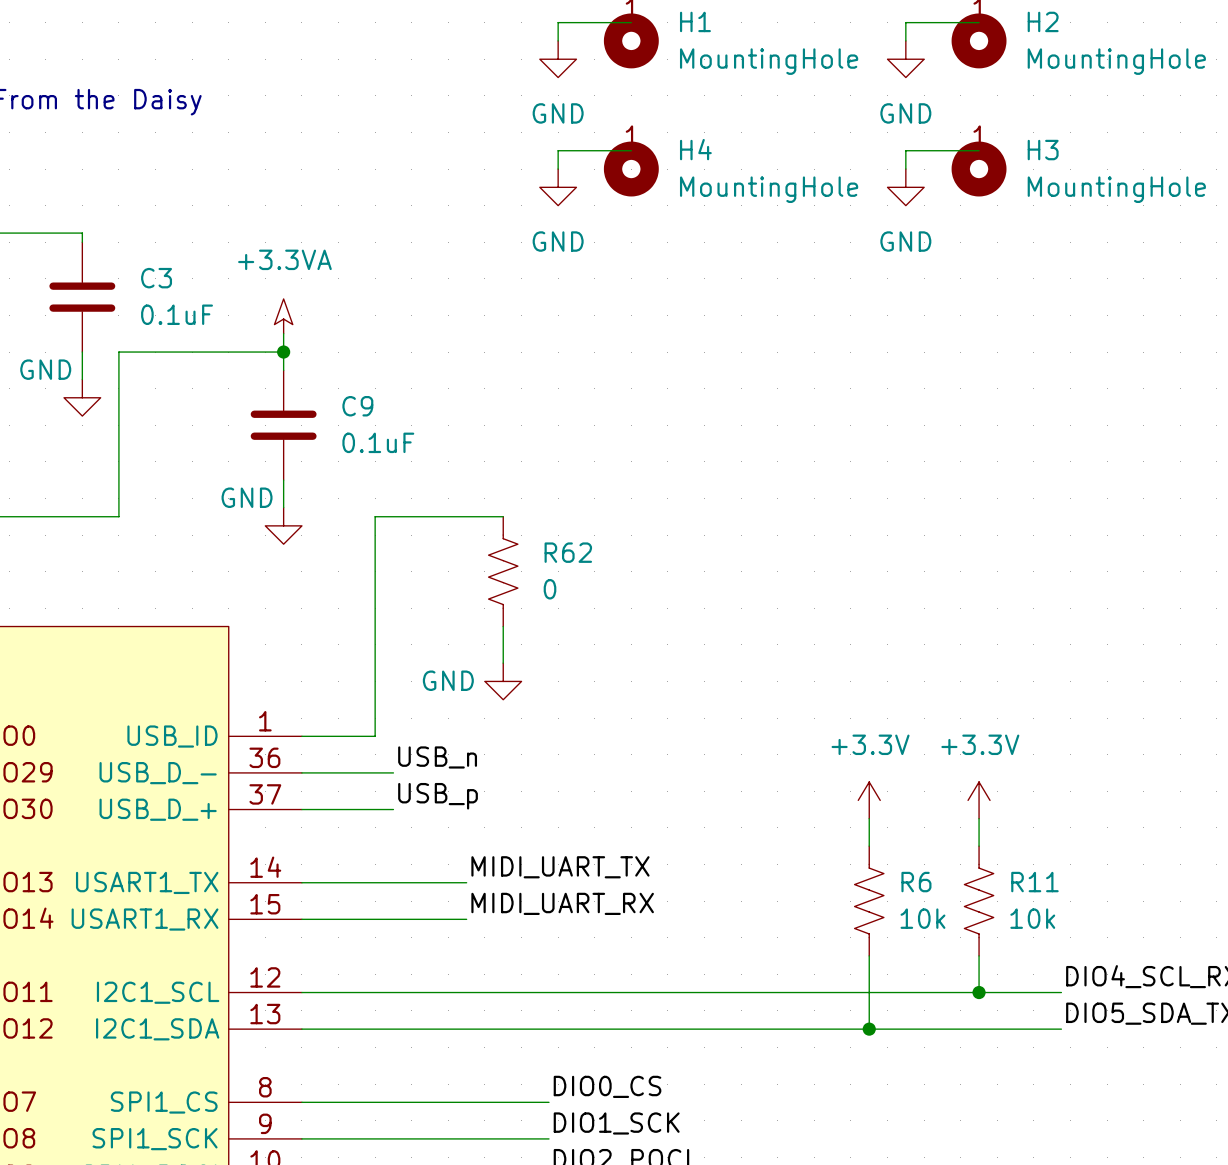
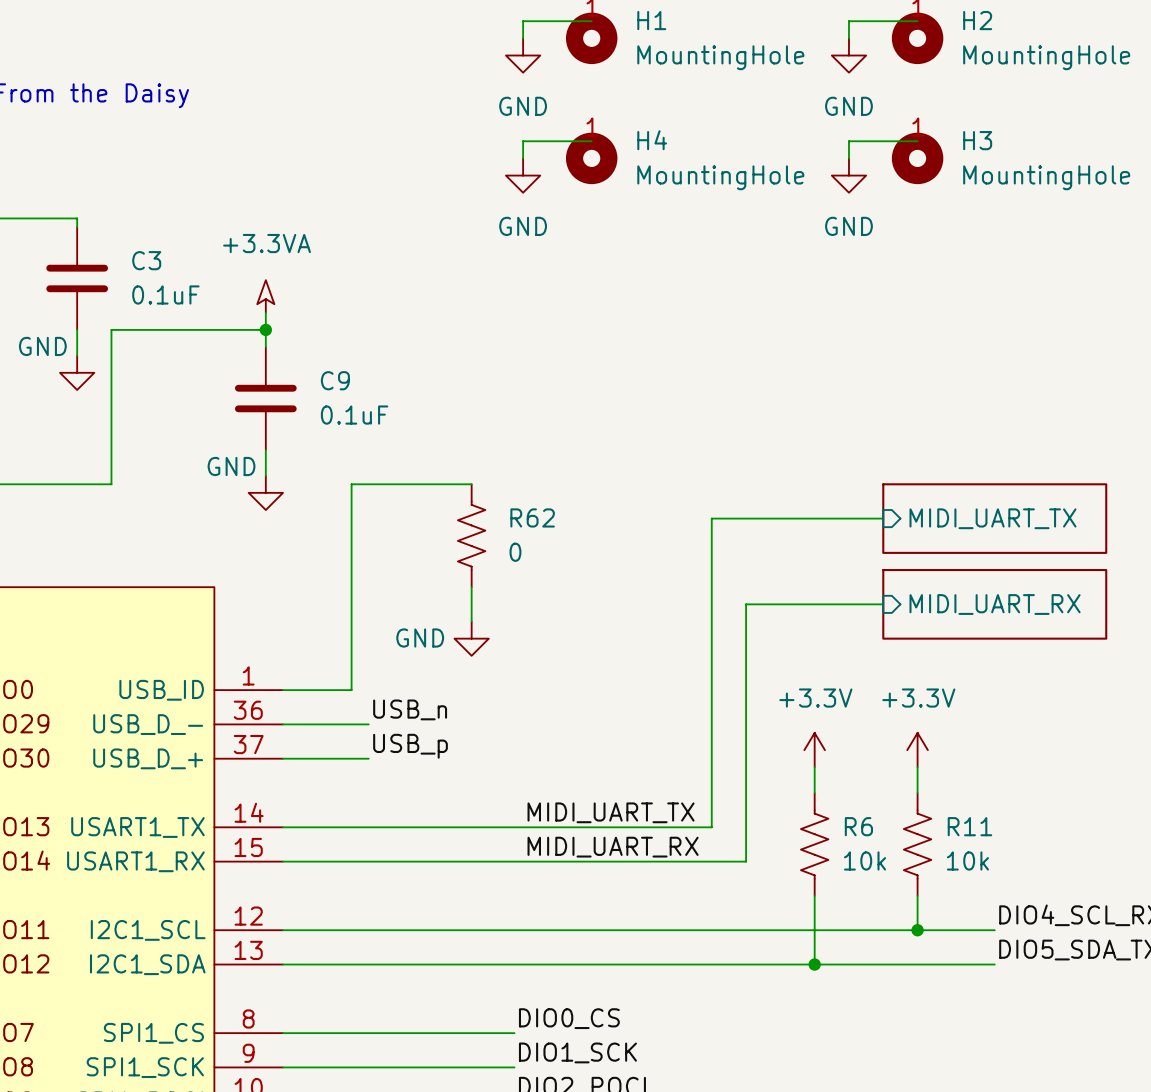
wire: none -> (883, 518) (711, 518) (711, 827) (437, 827)
sheet pin: none -> MIDI_UART_TX (992, 518)
sheet: none -> (994, 518)
wire: none -> (883, 604) (746, 604) (746, 861) (437, 861)
sheet: none -> (994, 604)
sheet pin: none -> MIDI_UART_RX (995, 604)
label position: MIDI_UART_TX (560, 867) -> MIDI_UART_TX (611, 812)
label position: MIDI_UART_RX (562, 903) -> MIDI_UART_RX (613, 847)

